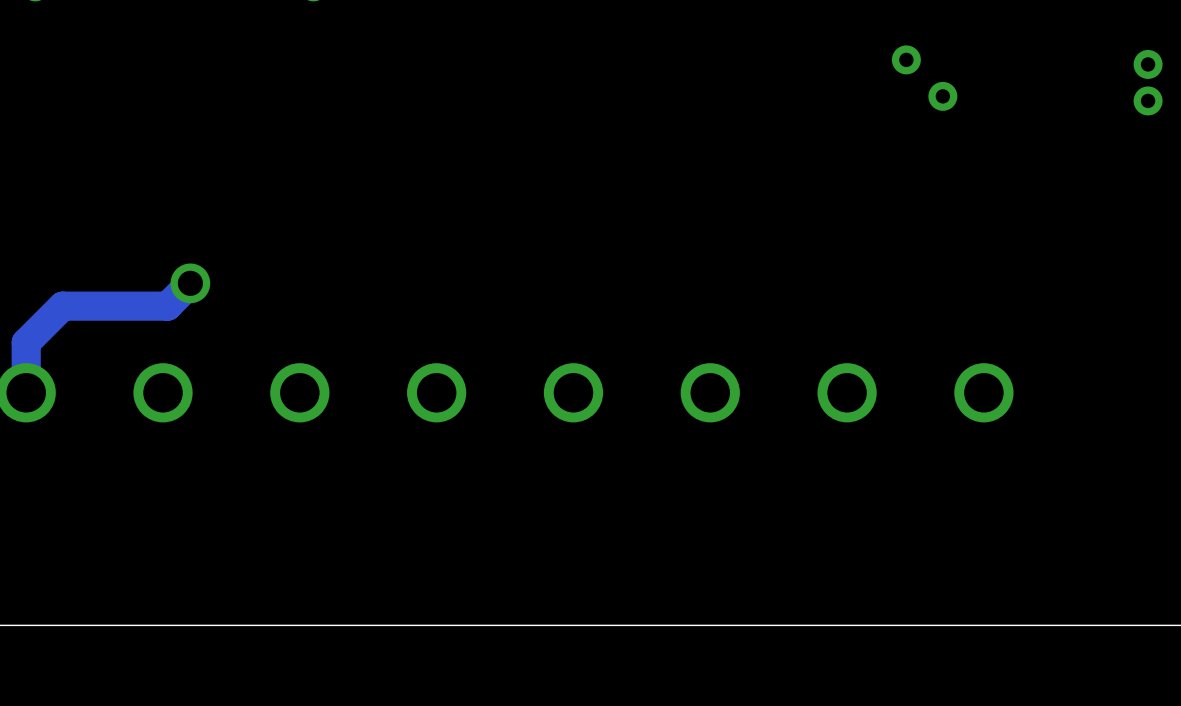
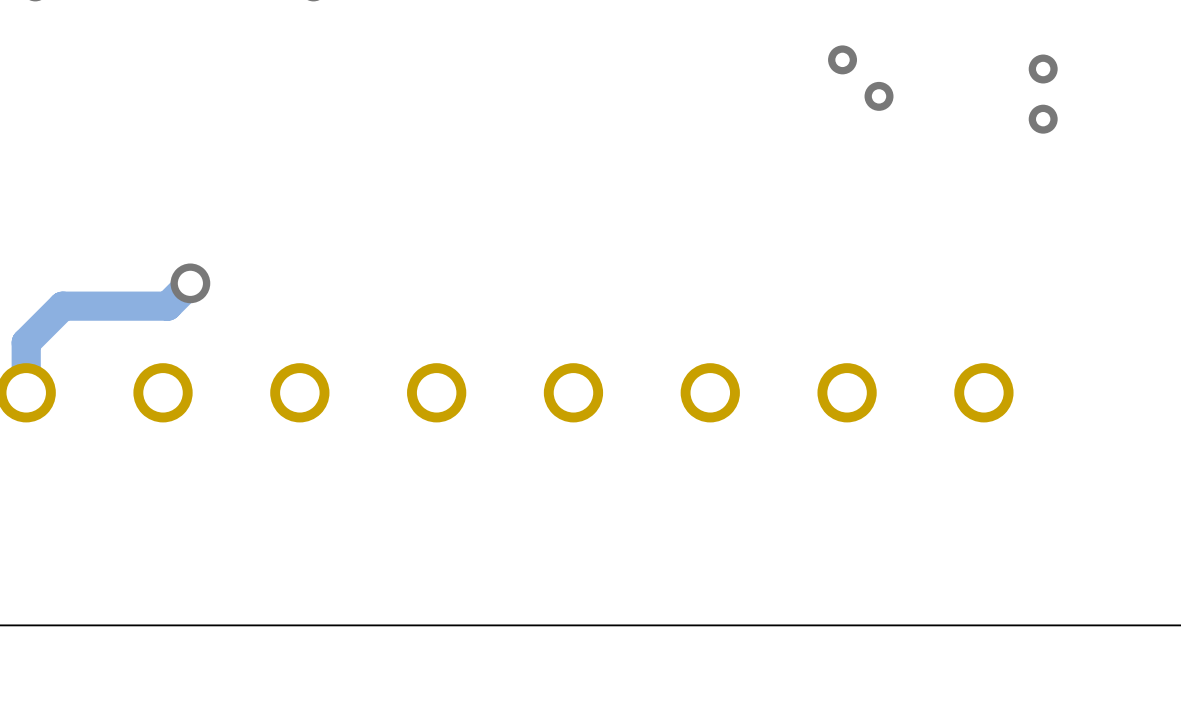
via: none -> (842, 59)
via: (906, 59) -> none
via: (1148, 64) -> none
via: none -> (1043, 69)
via: none -> (879, 96)
via: (942, 96) -> none
via: (1148, 100) -> none
via: none -> (1043, 119)

